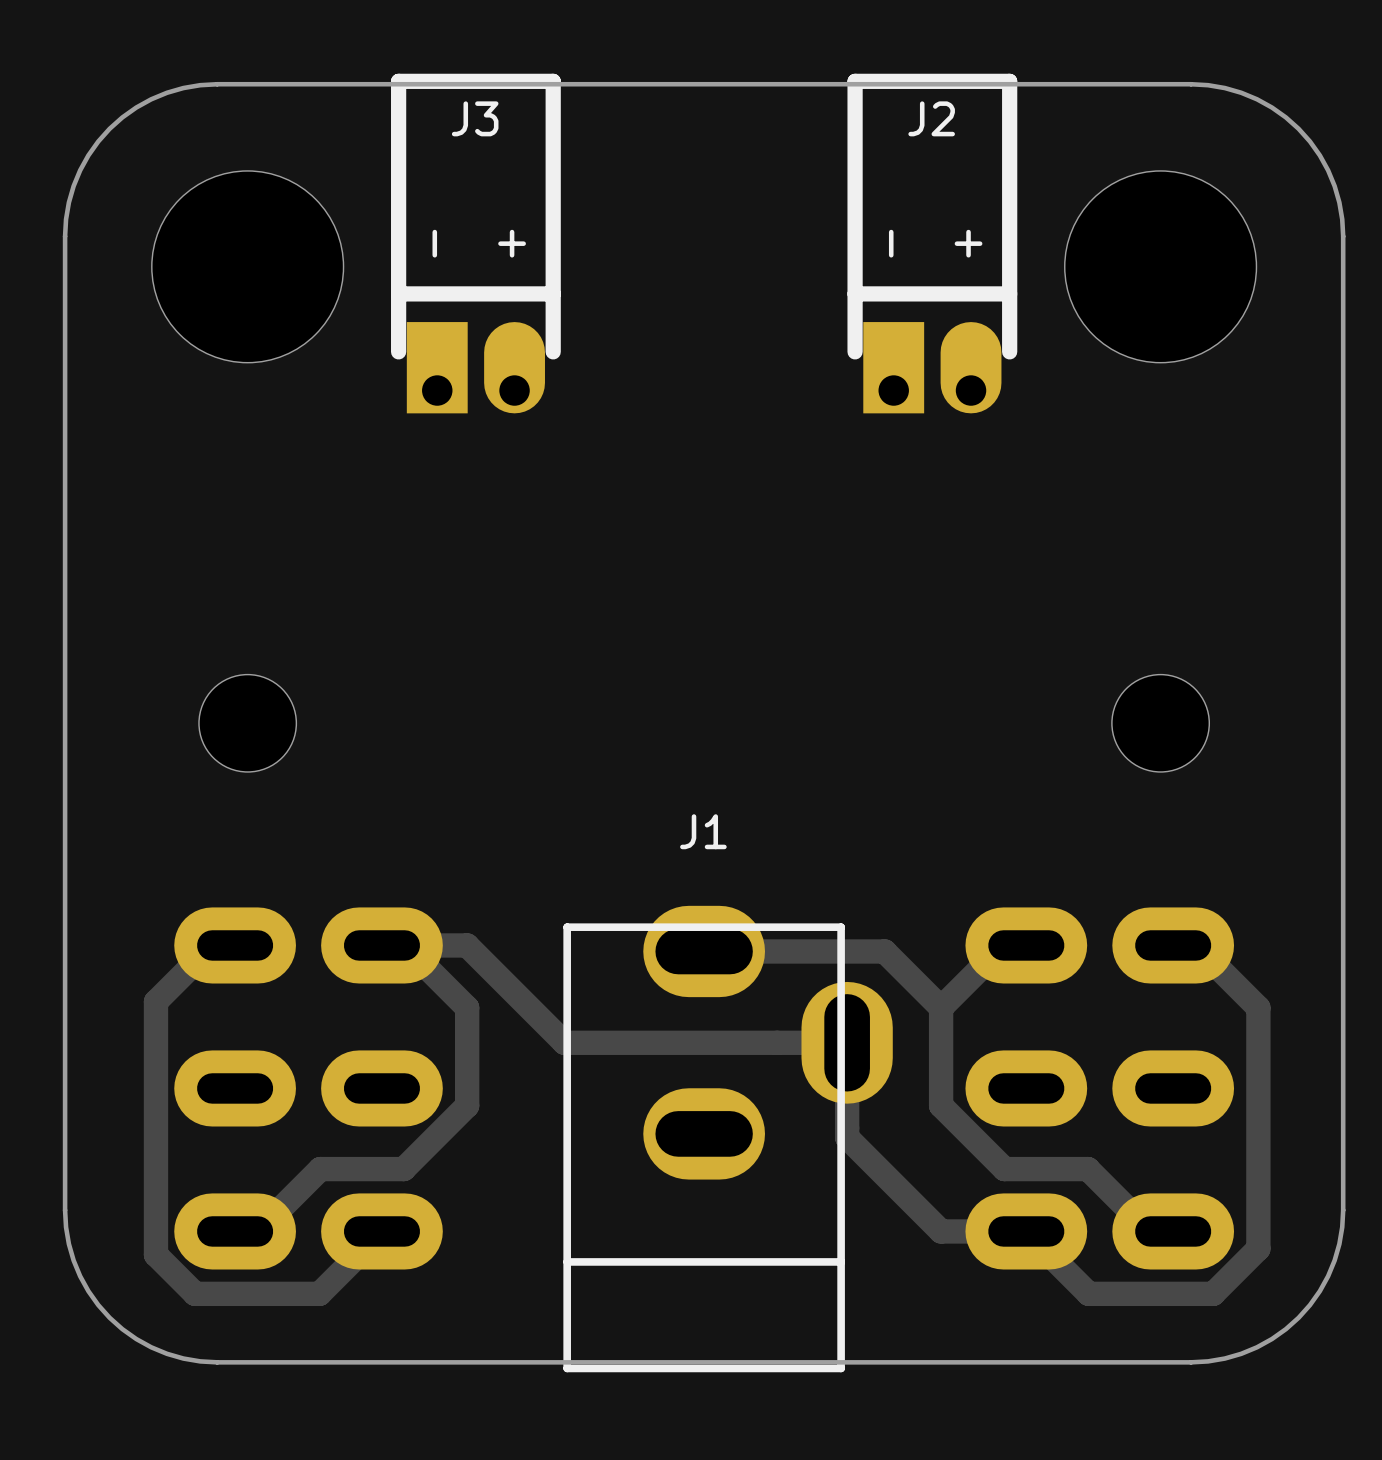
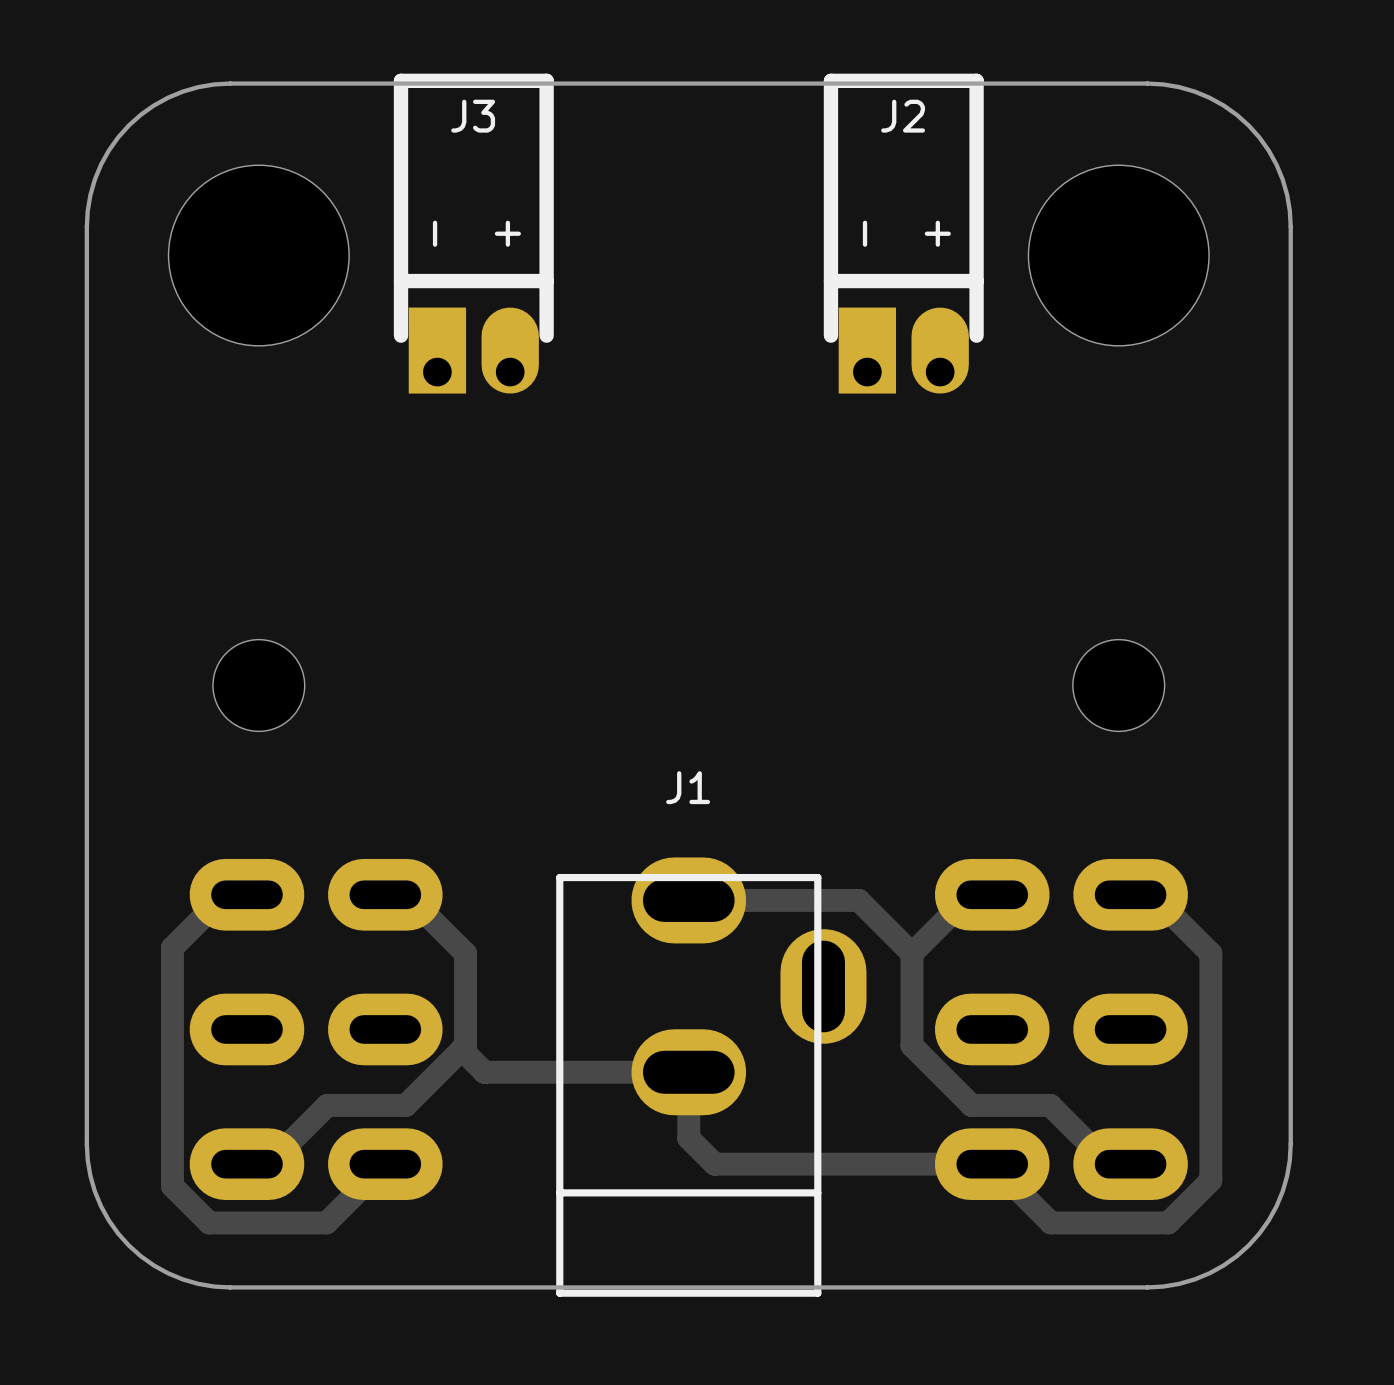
track: (404, 945) (467, 945) (564, 1042) (847, 1042) (847, 1137) (941, 1231) -> (461, 1049) (484, 1072) (688, 1072) (688, 1138) (714, 1164) (911, 1164)

